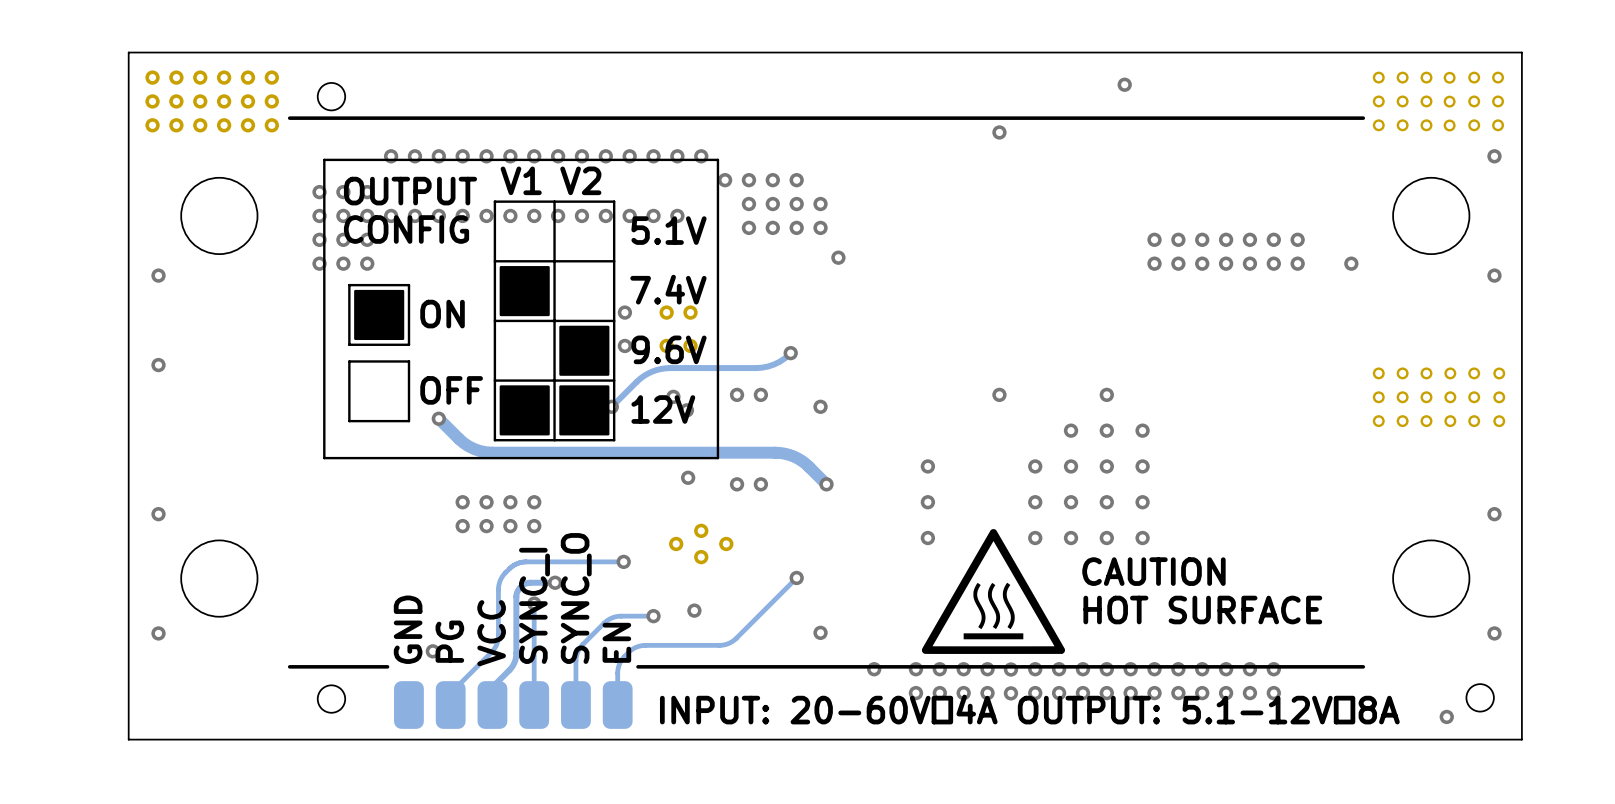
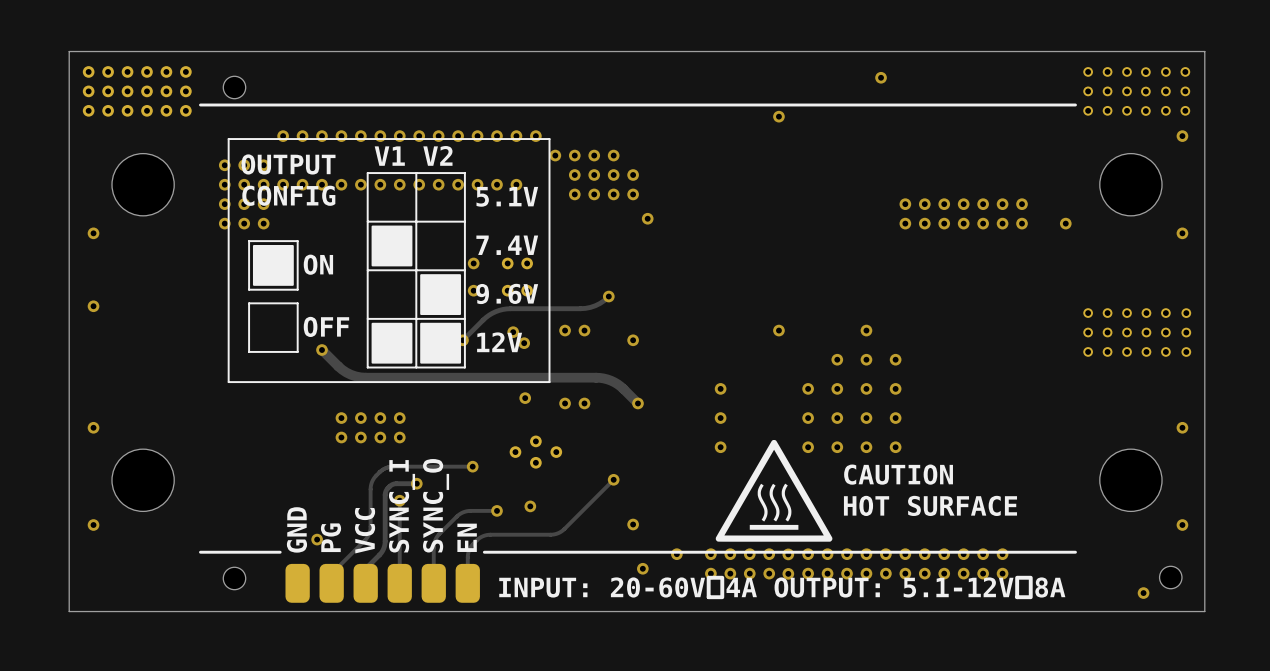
via: none -> (642, 568)

